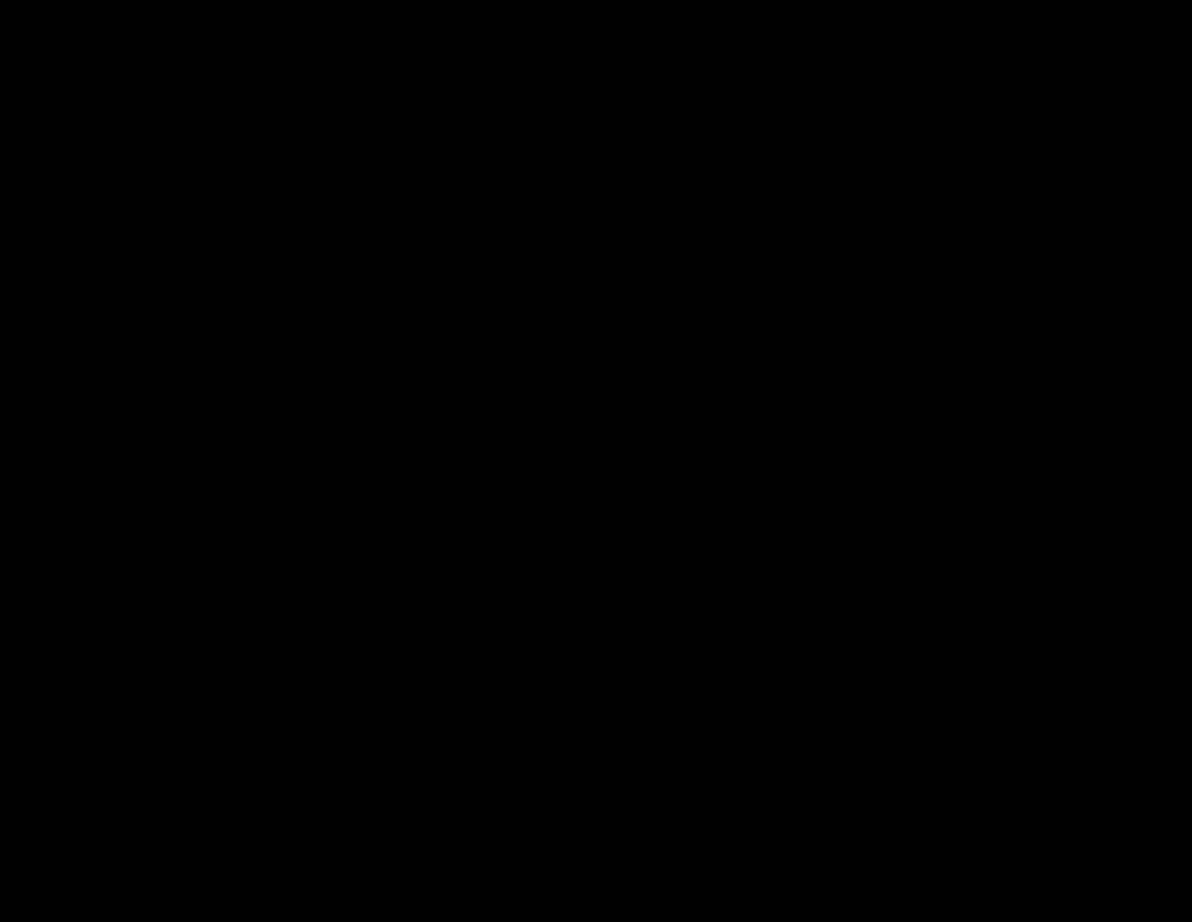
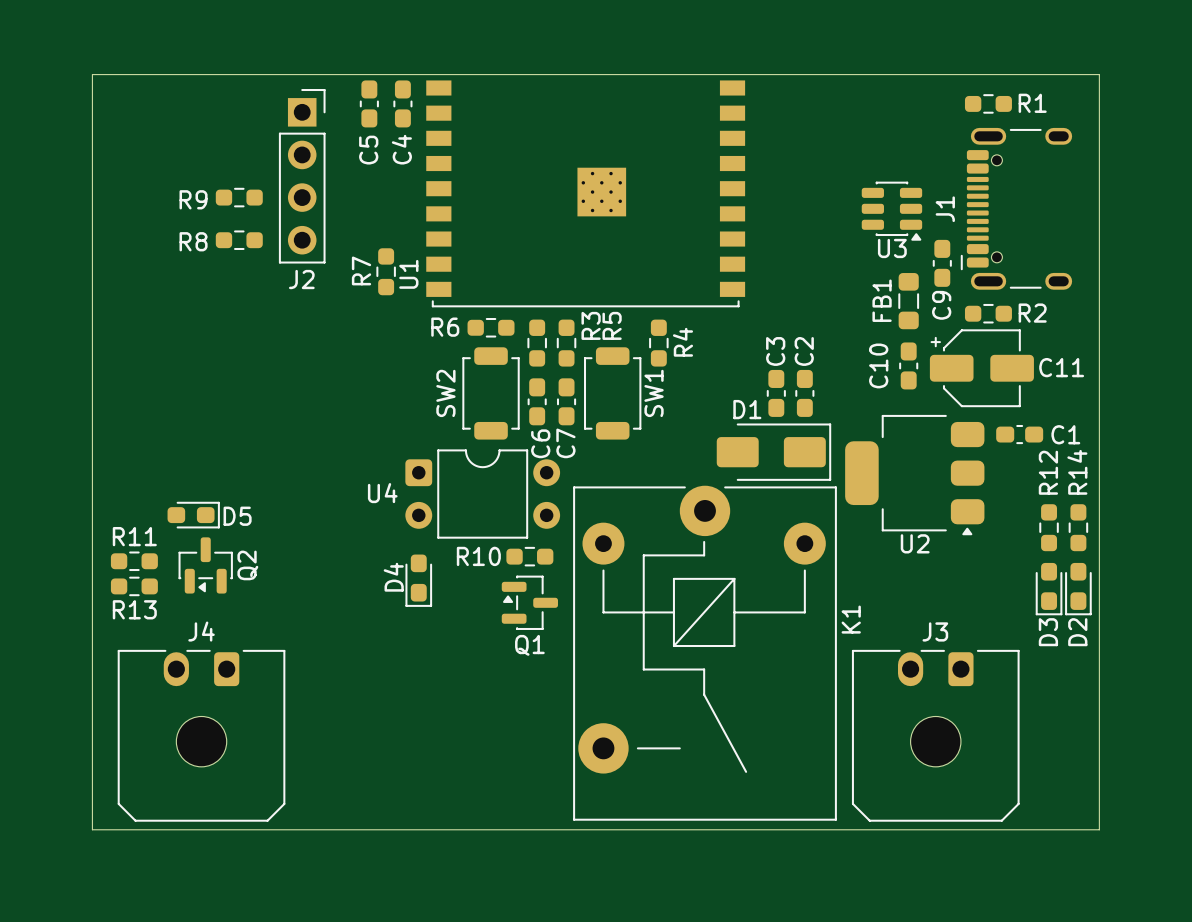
board edge: none -> (92, 74) (1099, 74) (1099, 829) (92, 829) (92, 74)
C5: none -> (369, 103)
C4: none -> (402, 103)
R1: none -> (988, 103)
J2: none -> (302, 176)
U1: none -> (585, 193)
R9: none -> (239, 197)
J1: none -> (1016, 208)
U3: none -> (891, 211)
R8: none -> (239, 240)
C9: none -> (942, 263)
R7: none -> (386, 271)
FB1: none -> (908, 301)
R2: none -> (988, 313)
R6: none -> (491, 327)
R3: none -> (537, 343)
R5: none -> (566, 343)
R4: none -> (658, 343)
C10: none -> (908, 365)
C11: none -> (981, 368)
SW2: none -> (491, 393)
SW1: none -> (612, 393)
C3: none -> (776, 393)
C2: none -> (804, 393)
C6: none -> (537, 401)
C7: none -> (566, 401)
C1: none -> (1019, 434)
D1: none -> (773, 452)
U2: none -> (914, 475)
U4: none -> (482, 494)
D5: none -> (193, 515)
R12: none -> (1049, 527)
R14: none -> (1078, 527)
R10: none -> (529, 556)
R11: none -> (134, 561)
Q2: none -> (205, 565)
D4: none -> (418, 580)
R13: none -> (134, 586)
D3: none -> (1049, 589)
D2: none -> (1078, 589)
Q1: none -> (529, 602)
K1: none -> (705, 653)
J4: none -> (201, 735)
J3: none -> (935, 735)

